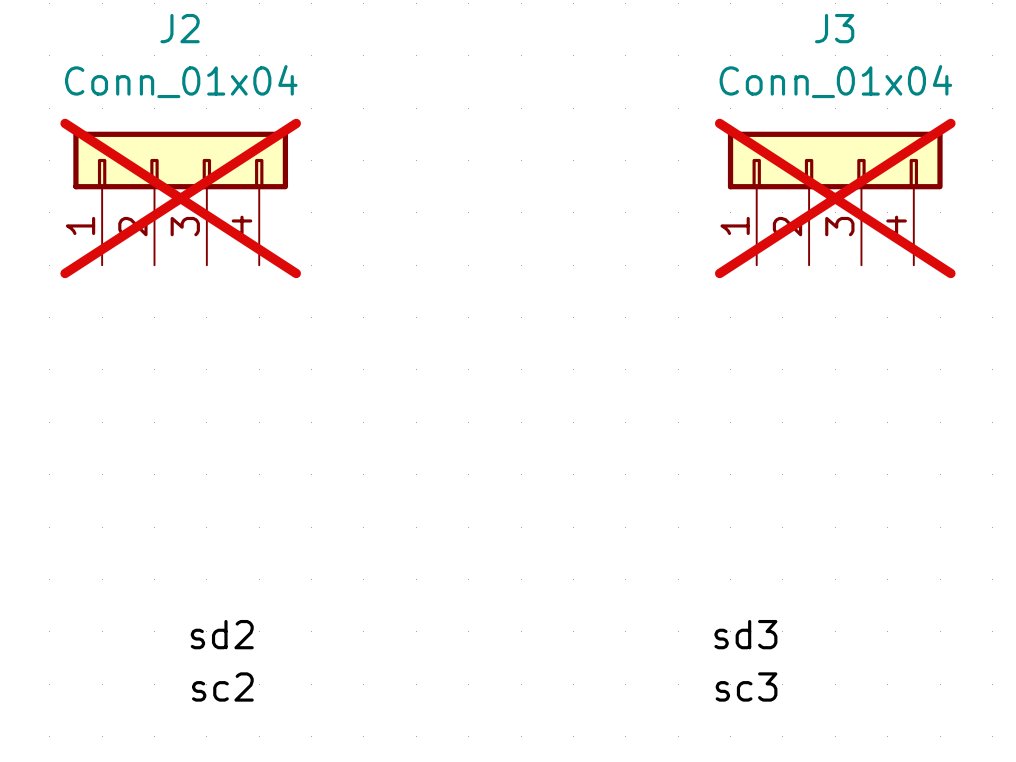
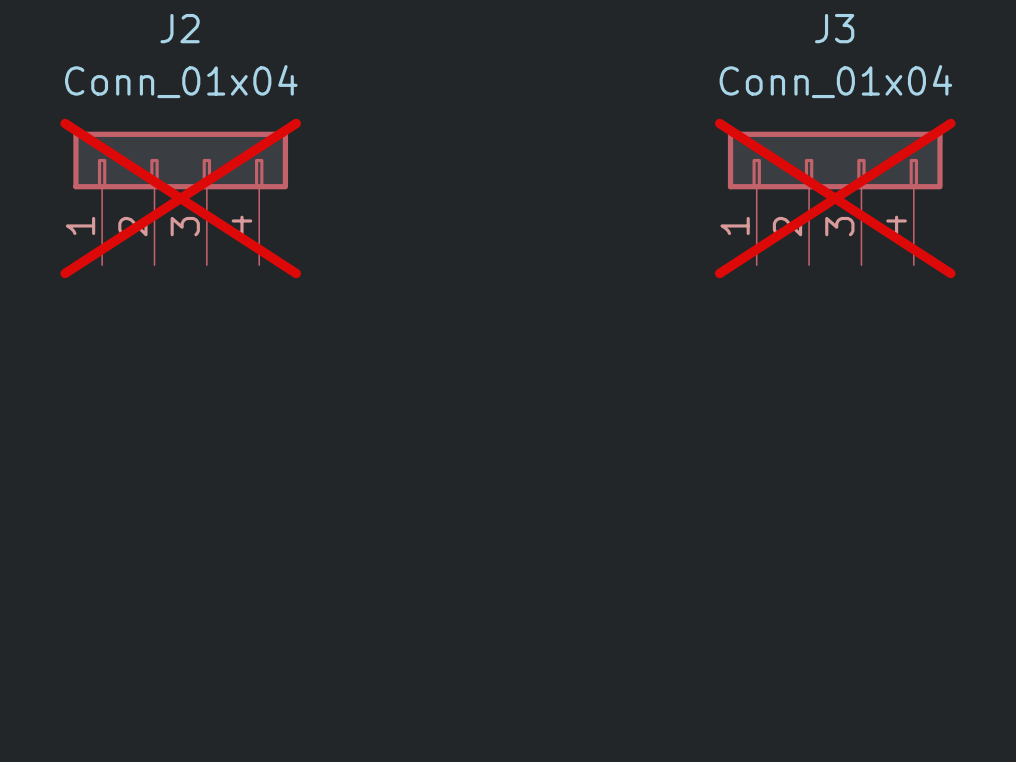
label: sd2 (222, 634) -> none
label: sd3 (745, 634) -> none
label: sc2 (222, 686) -> none
label: sc3 (746, 686) -> none

